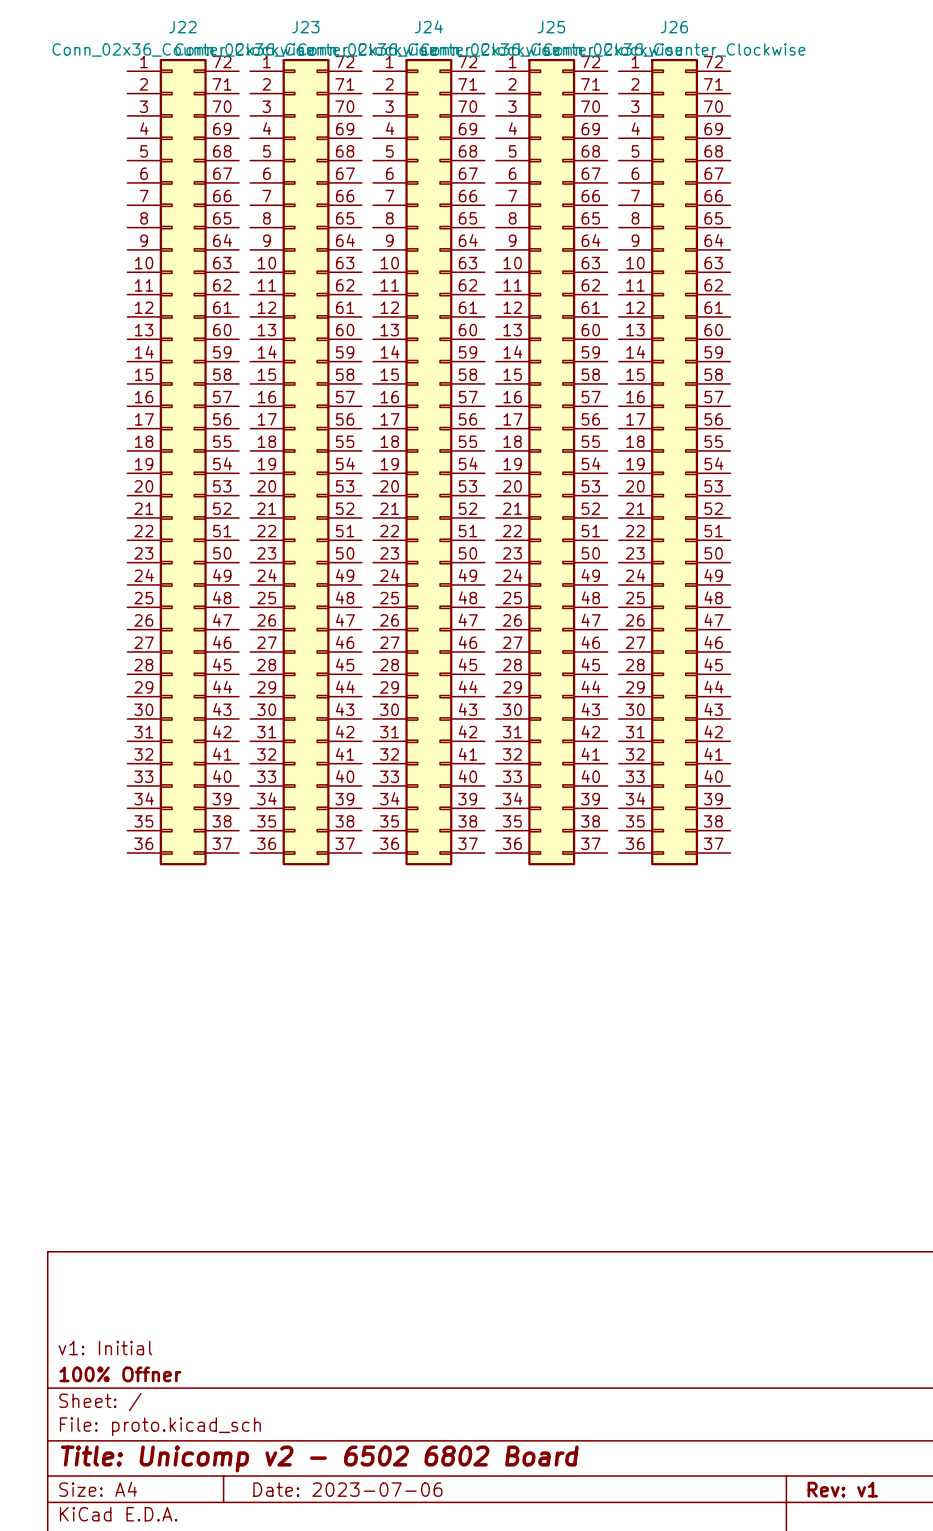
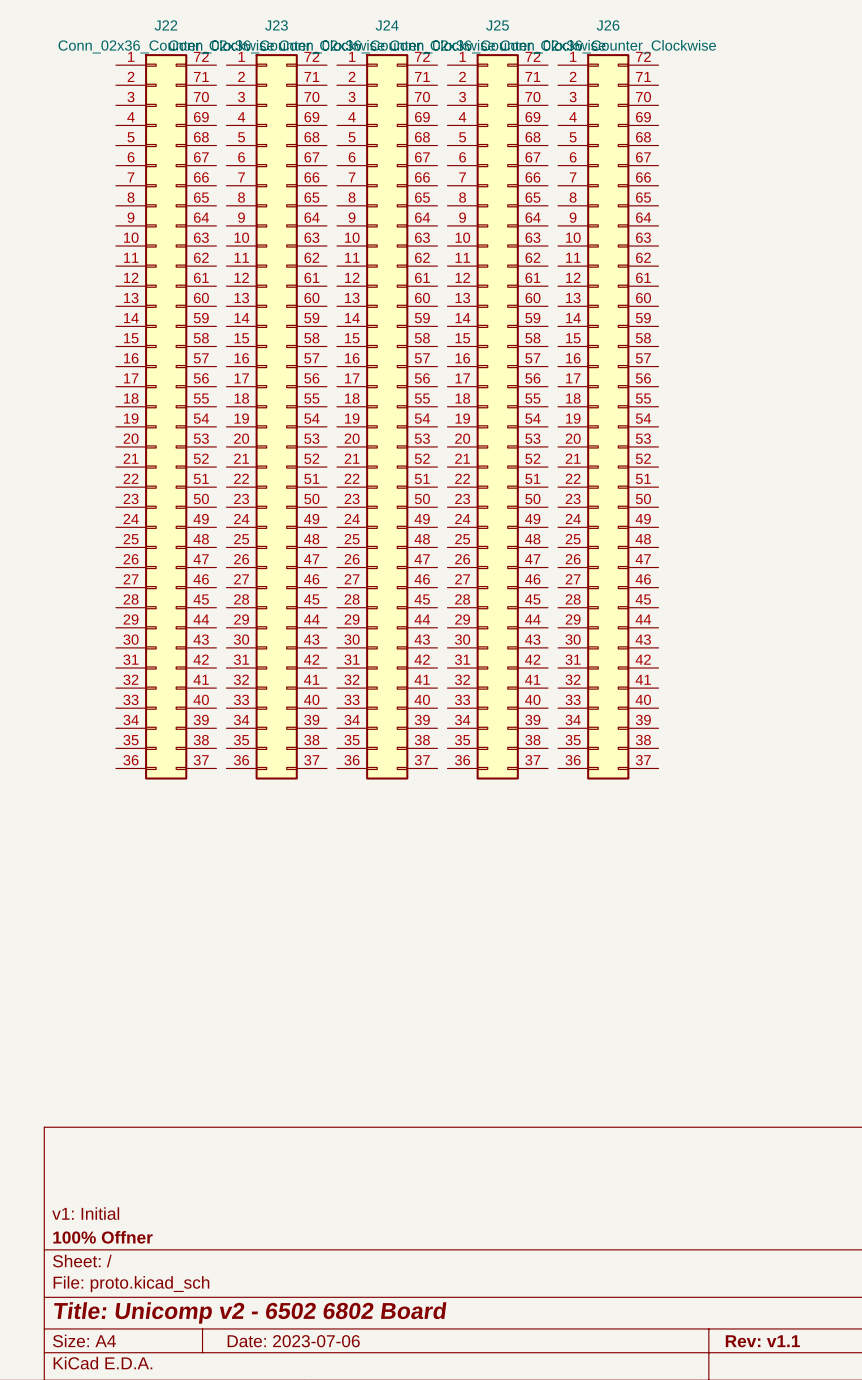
title block: Rev: v1 (842, 1489) -> Rev: v1.1 (762, 1341)

